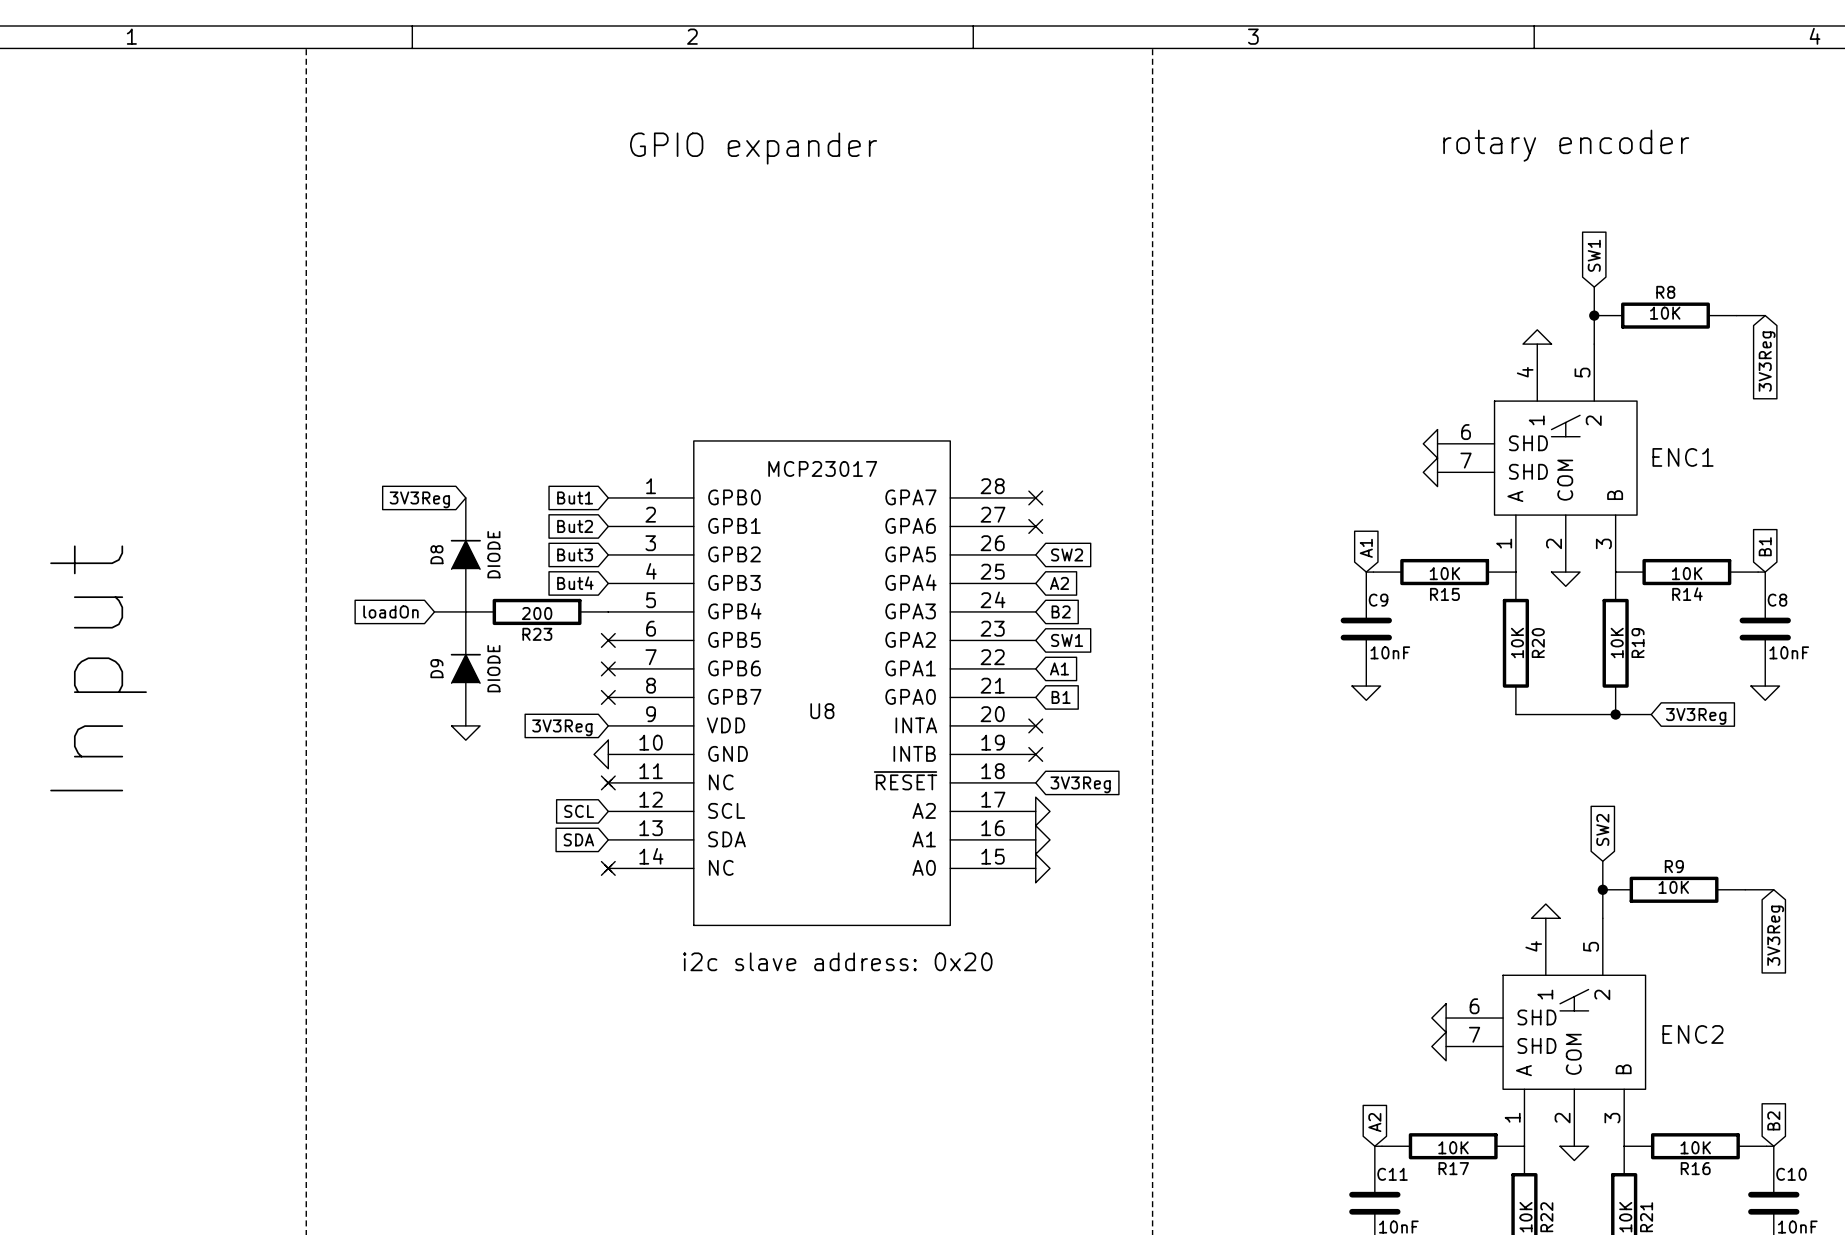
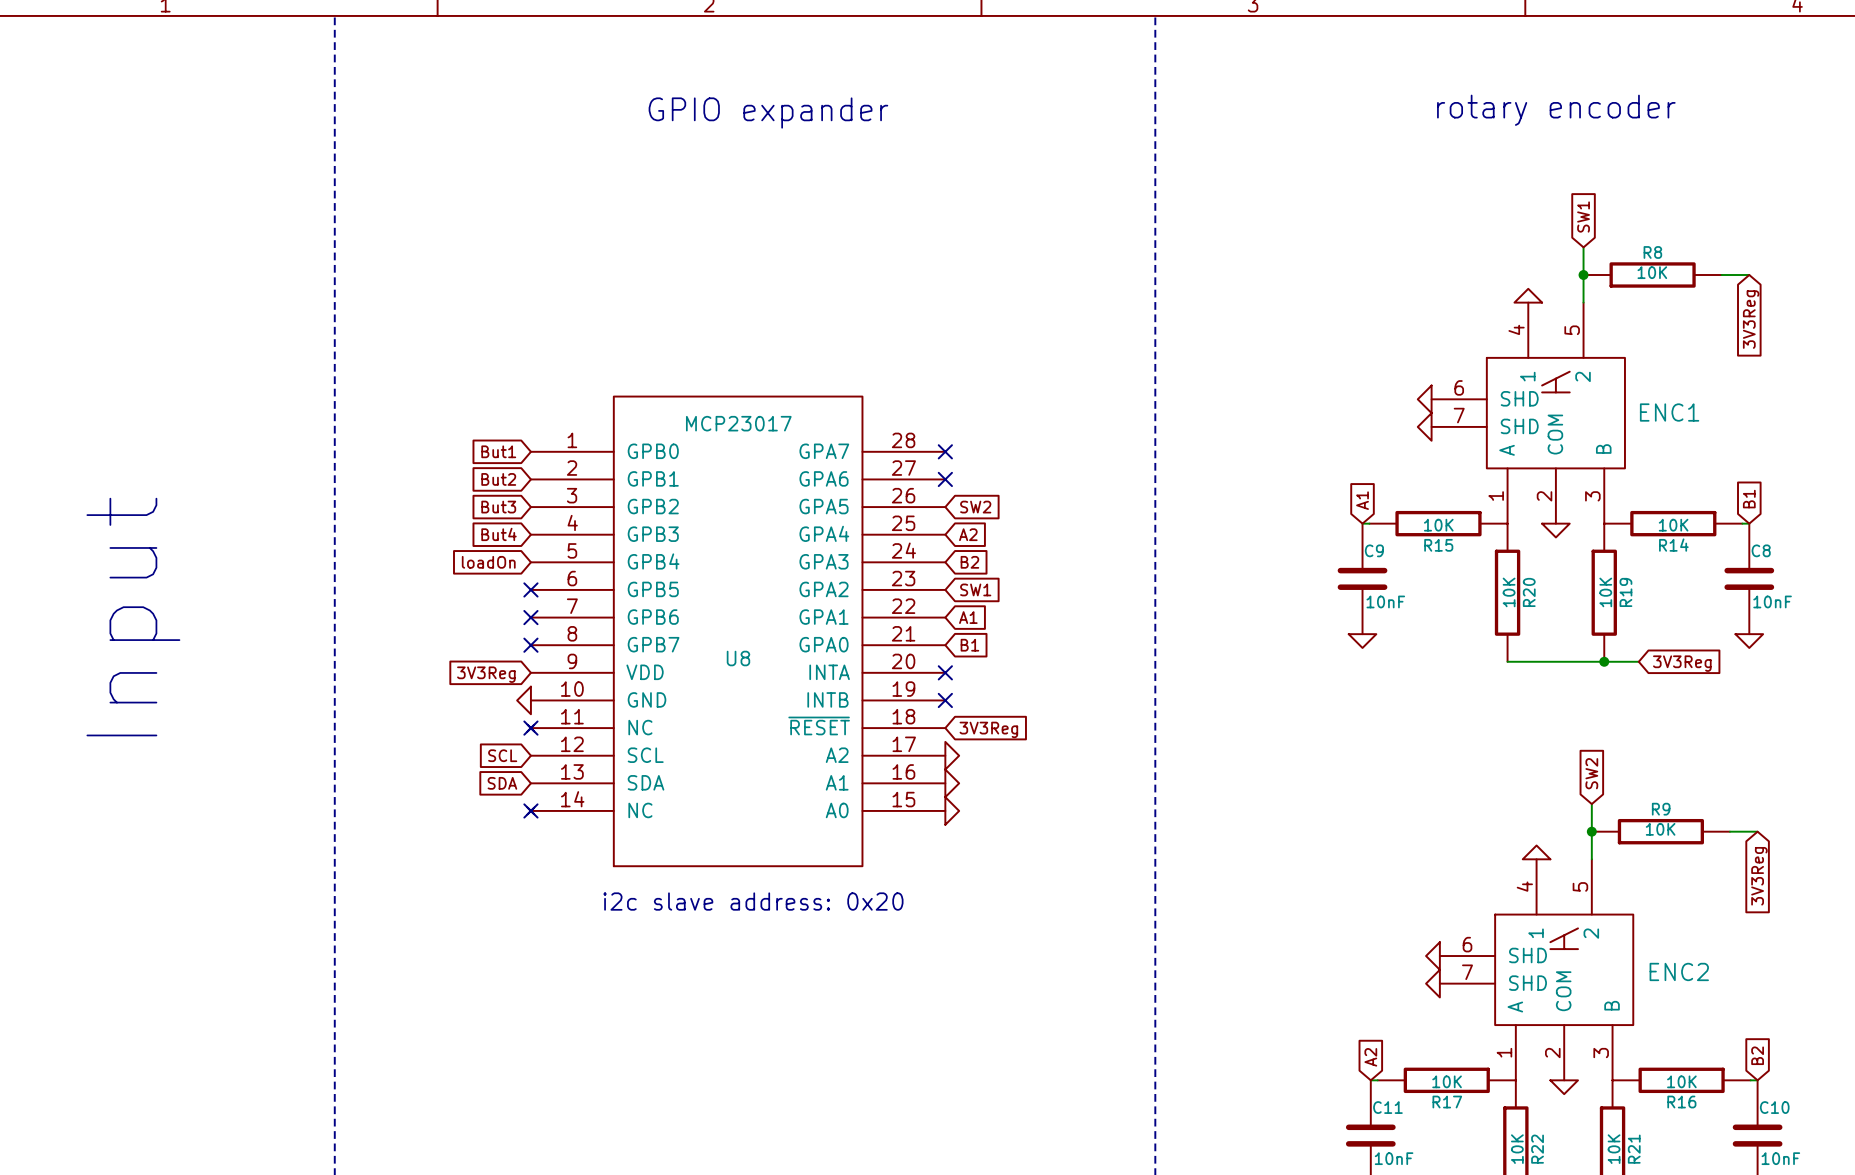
global label position: But1 (575, 497) -> But1 (498, 451)
no-connect mark: none -> (945, 451)
no-connect mark: (1035, 497) -> none
global label: 3V3Reg (419, 499) -> none
global label position: But2 (575, 526) -> But2 (498, 479)
no-connect mark: none -> (945, 479)
no-connect mark: (1035, 526) -> none
D8: DIODE (465, 554) -> none
global label position: But3 (575, 554) -> But3 (498, 507)
global label position: SW2 (1067, 554) -> SW2 (975, 507)
global label position: But4 (575, 583) -> But4 (499, 534)
global label position: A2 (1059, 583) -> A2 (968, 534)
global label position: loadOn (390, 611) -> loadOn (488, 562)
wire: (434, 611) (465, 611) -> none
R23: 200 (537, 611) -> none
global label position: B2 (1061, 611) -> B2 (969, 562)
no-connect mark: none -> (530, 589)
no-connect mark: (608, 640) -> none
global label position: SW1 (1067, 640) -> SW1 (975, 589)
D9: DIODE (465, 668) -> none
no-connect mark: none -> (530, 617)
no-connect mark: (608, 668) -> none
global label position: A1 (1059, 668) -> A1 (968, 617)
U8 position: (820, 683) -> (736, 631)
no-connect mark: none -> (530, 645)
no-connect mark: (608, 697) -> none
global label position: B1 (1061, 697) -> B1 (969, 645)
no-connect mark: none -> (945, 672)
no-connect mark: (1035, 725) -> none
global label position: 3V3Reg (562, 727) -> 3V3Reg (486, 674)
power symbol rotation: 0° (465, 733) -> 90° clockwise (524, 700)
power symbol position: (465, 733) -> (524, 700)
power symbol: (601, 754) -> none
no-connect mark: none -> (945, 700)
no-connect mark: (1035, 754) -> none
no-connect mark: none -> (530, 728)
no-connect mark: (608, 782) -> none
global label position: 3V3Reg (1080, 784) -> 3V3Reg (988, 729)
global label position: SCL (579, 811) -> SCL (502, 755)
power symbol: none -> (952, 755)
power symbol: (1042, 811) -> none
global label position: SDA (578, 839) -> SDA (502, 783)
power symbol: none -> (952, 783)
power symbol: (1042, 839) -> none
no-connect mark: none -> (530, 810)
no-connect mark: (608, 868) -> none
power symbol: none -> (952, 810)
power symbol: (1042, 868) -> none
text position: i2c slave address: 0x20 (837, 961) -> i2c slave address: 0x20 (753, 901)

